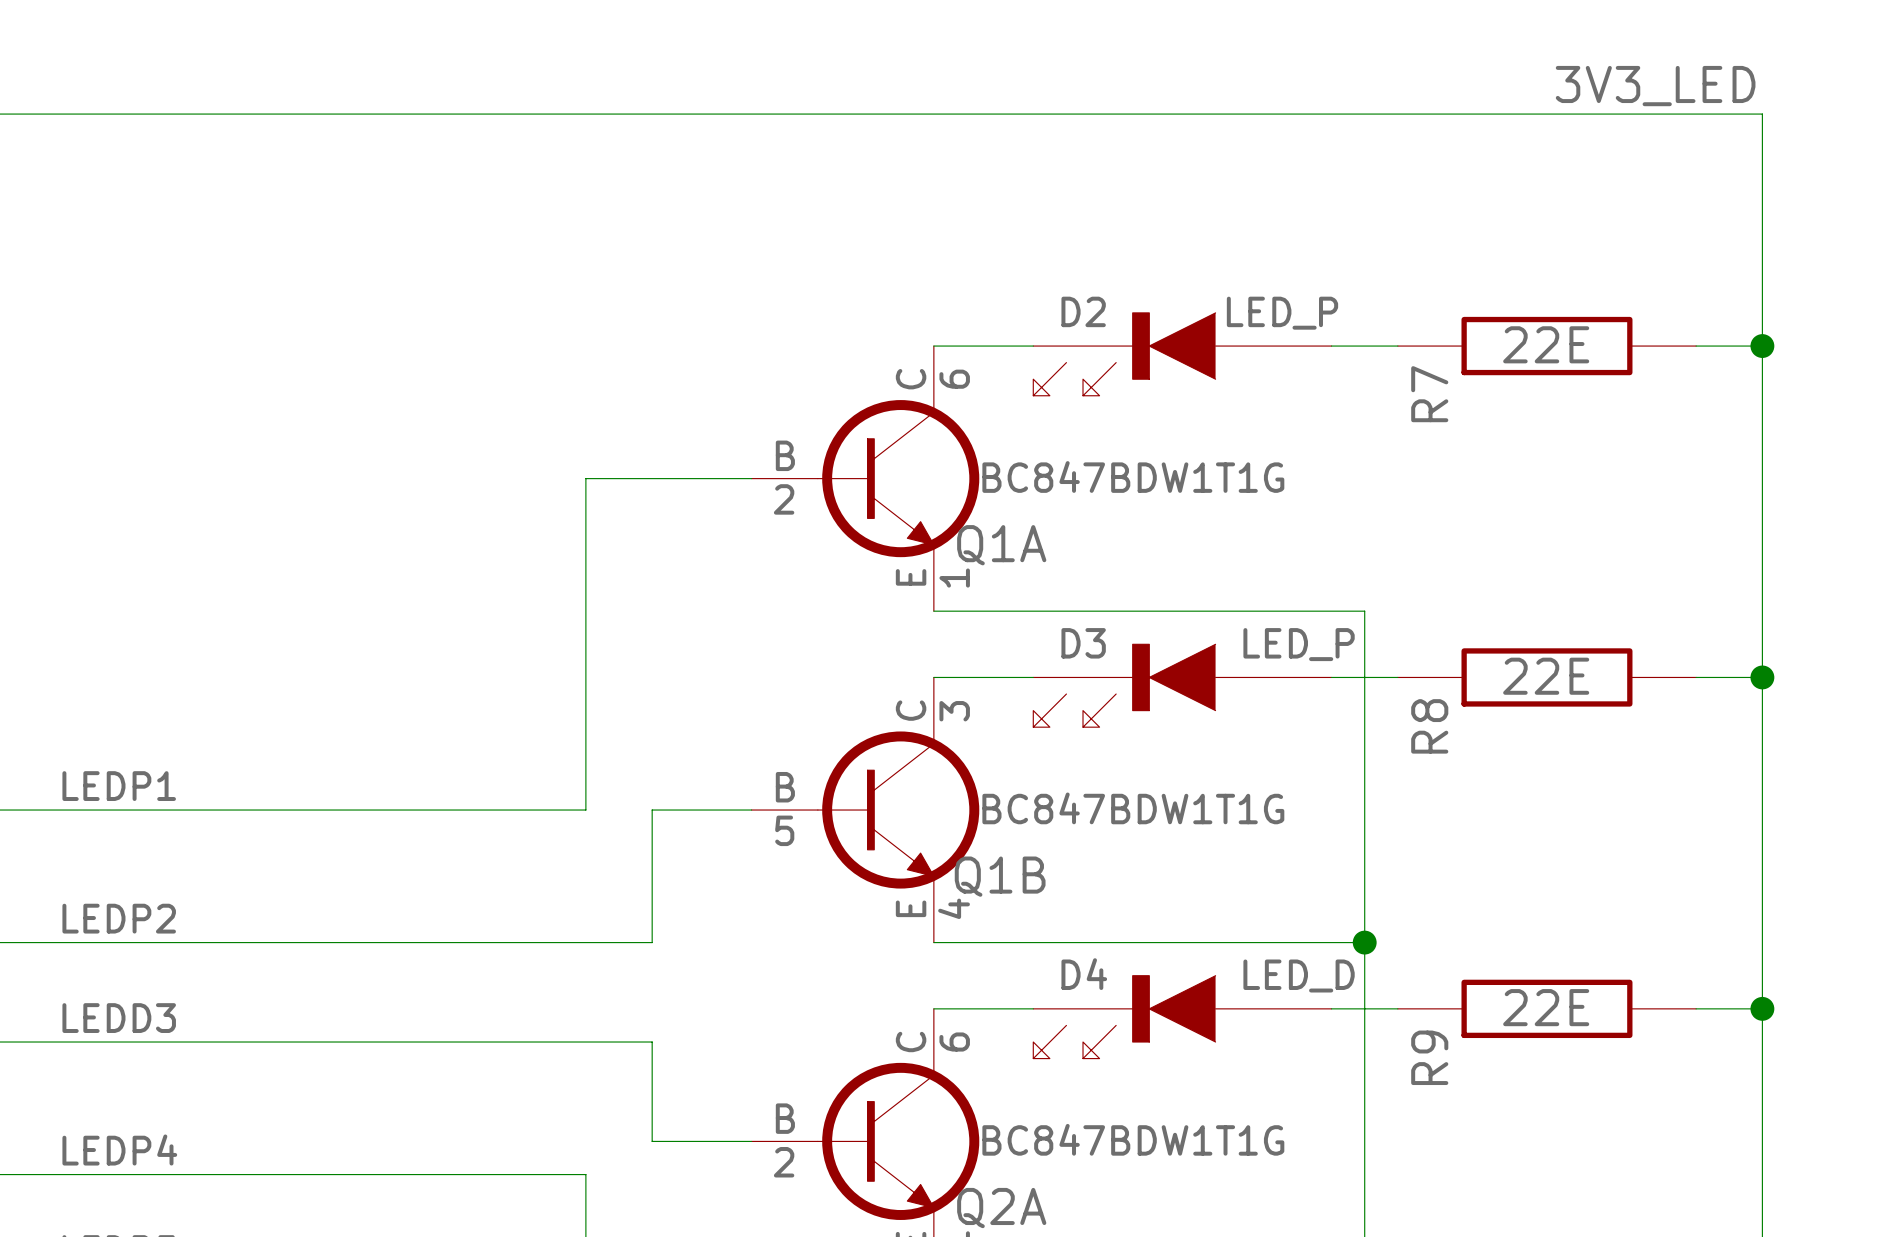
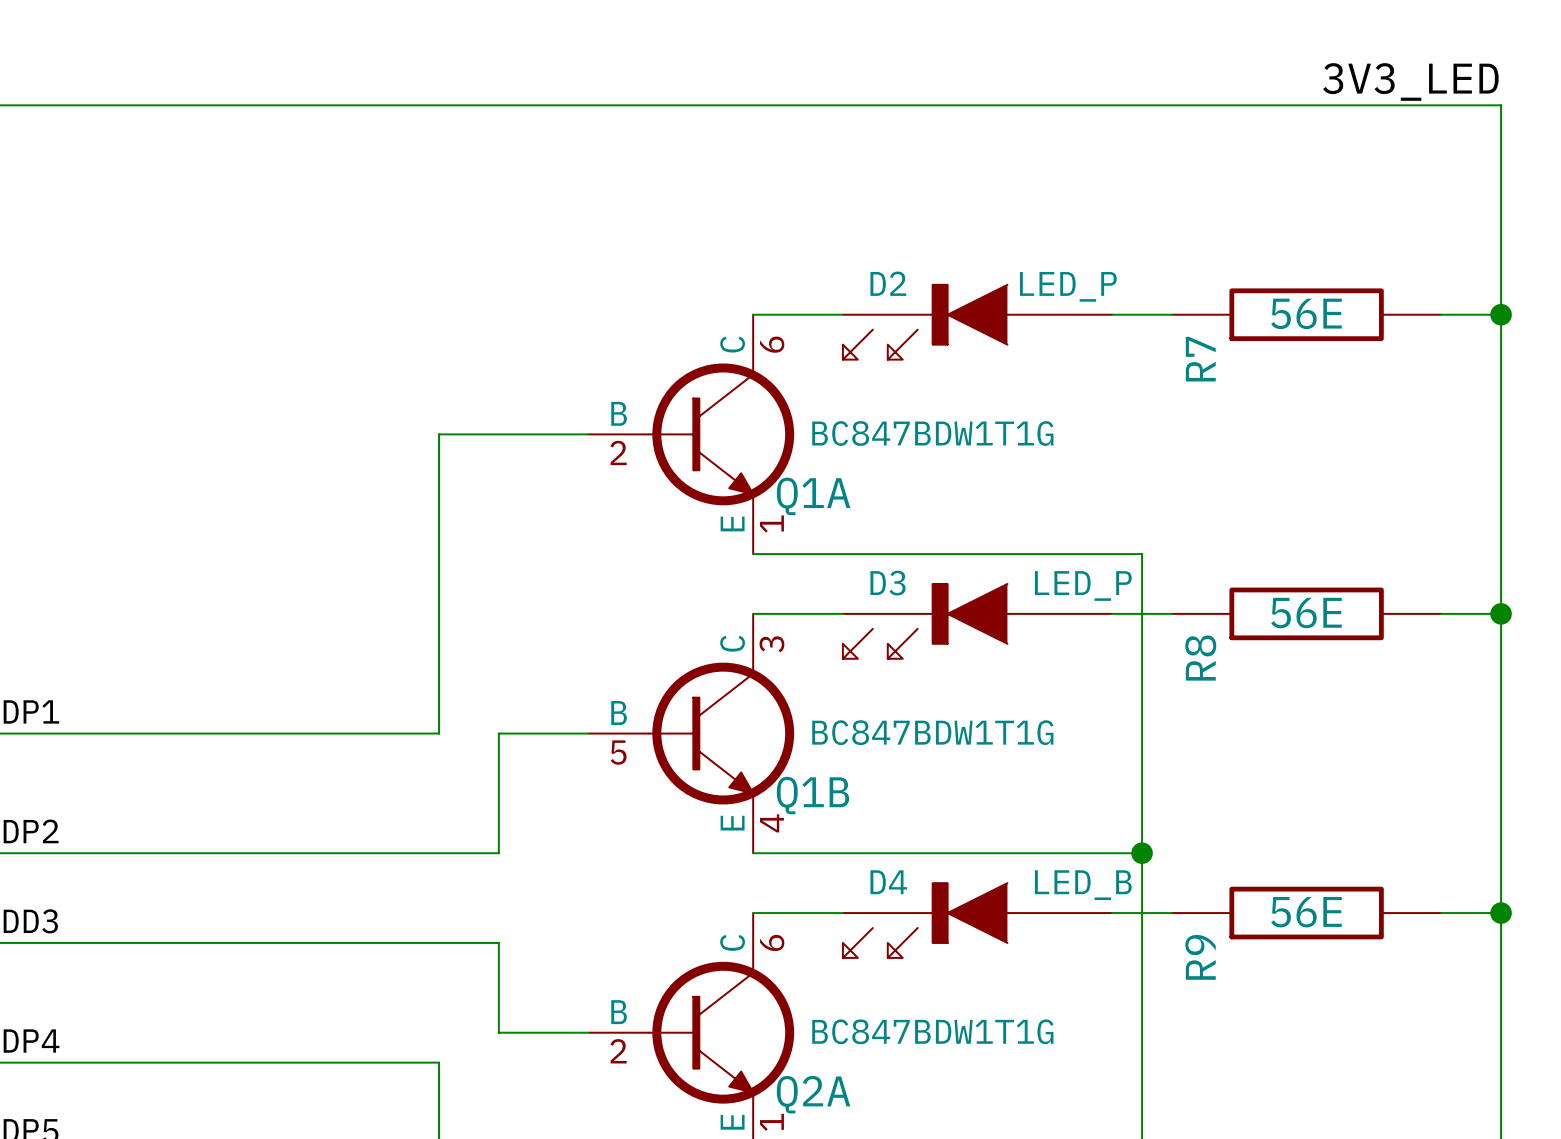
R7 value: 22E (1546, 344) -> 56E (1306, 313)
R8 value: 22E (1546, 676) -> 56E (1306, 613)
D4 value: LED_D (1299, 975) -> LED_B (1083, 885)
R9 value: 22E (1546, 1007) -> 56E (1306, 912)

